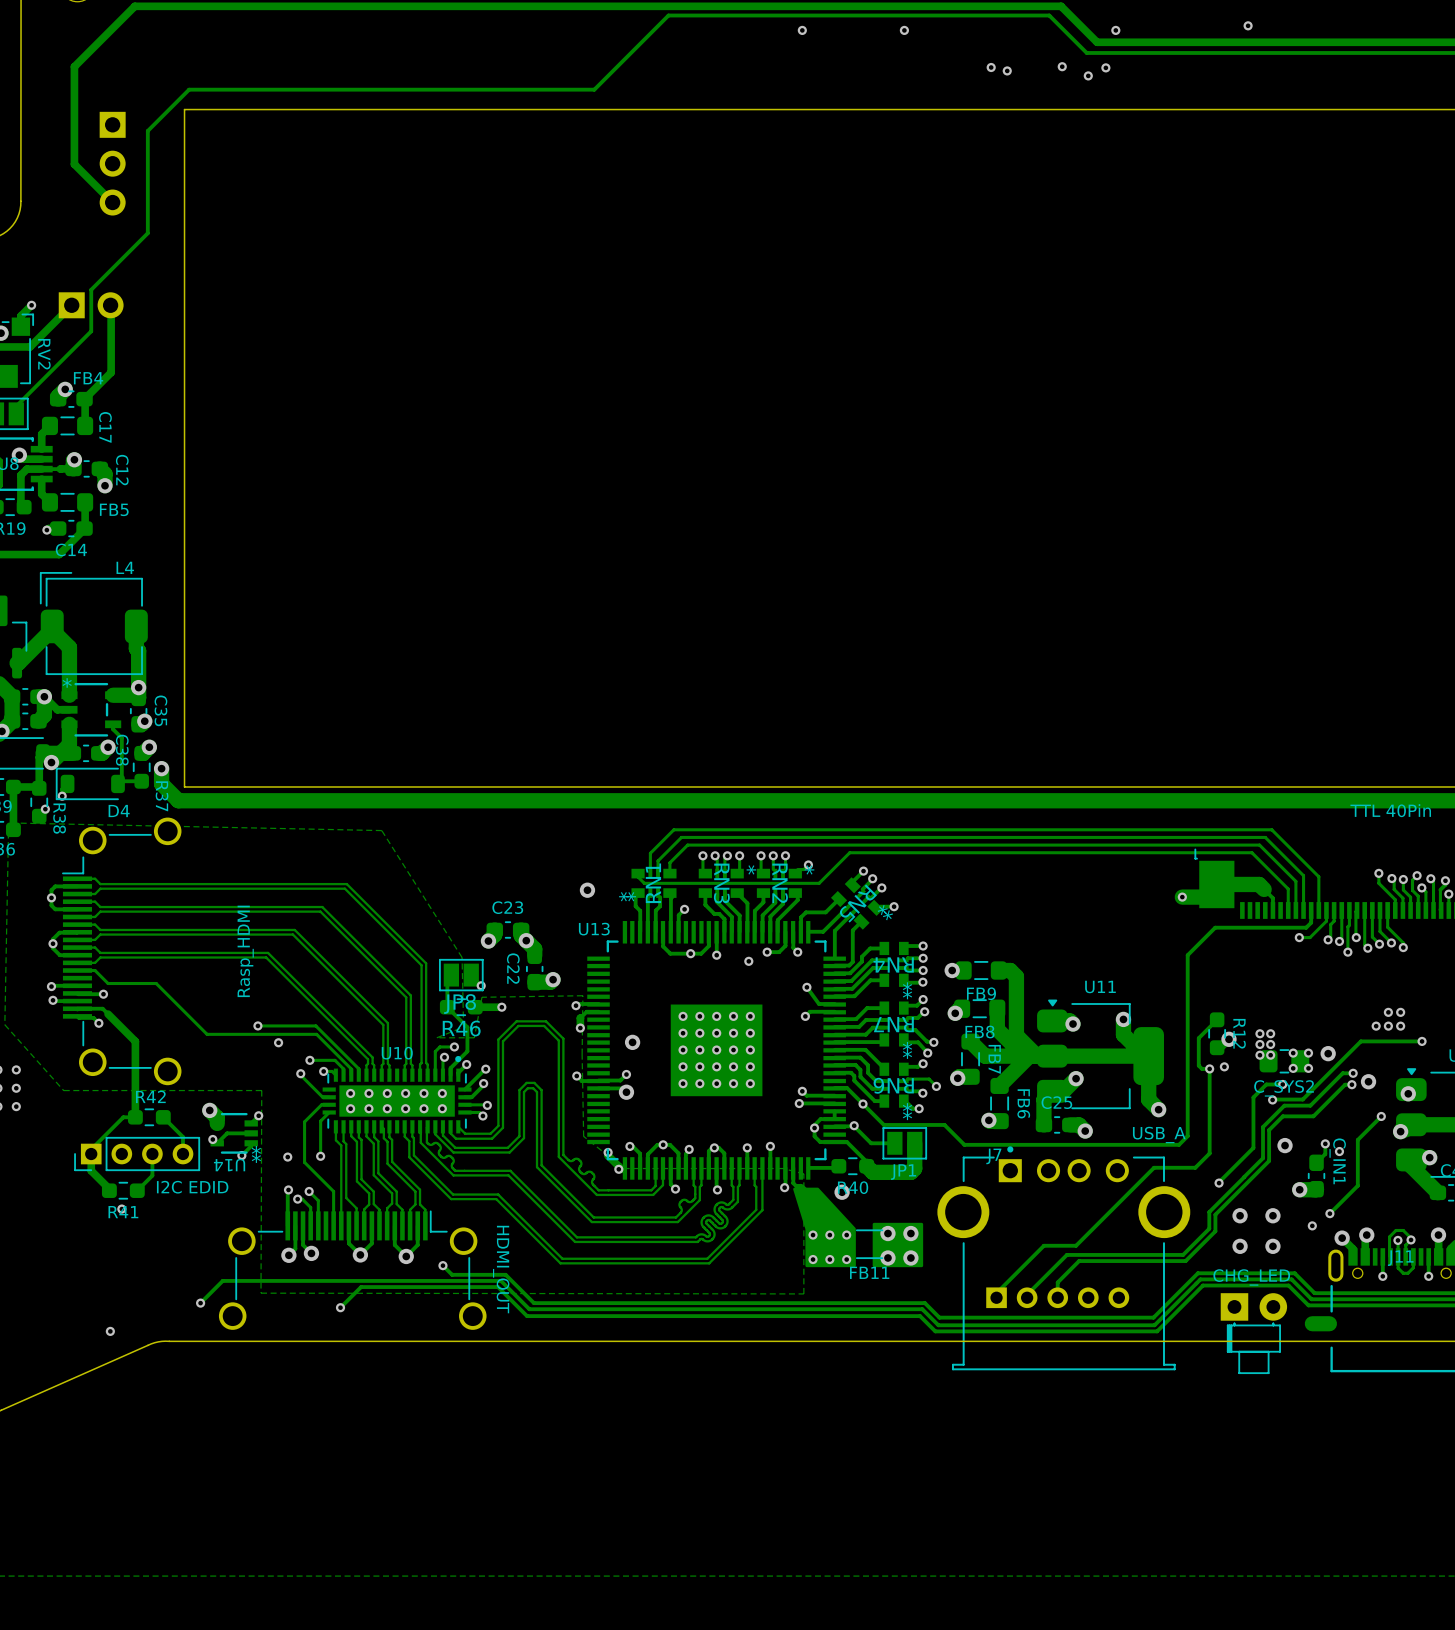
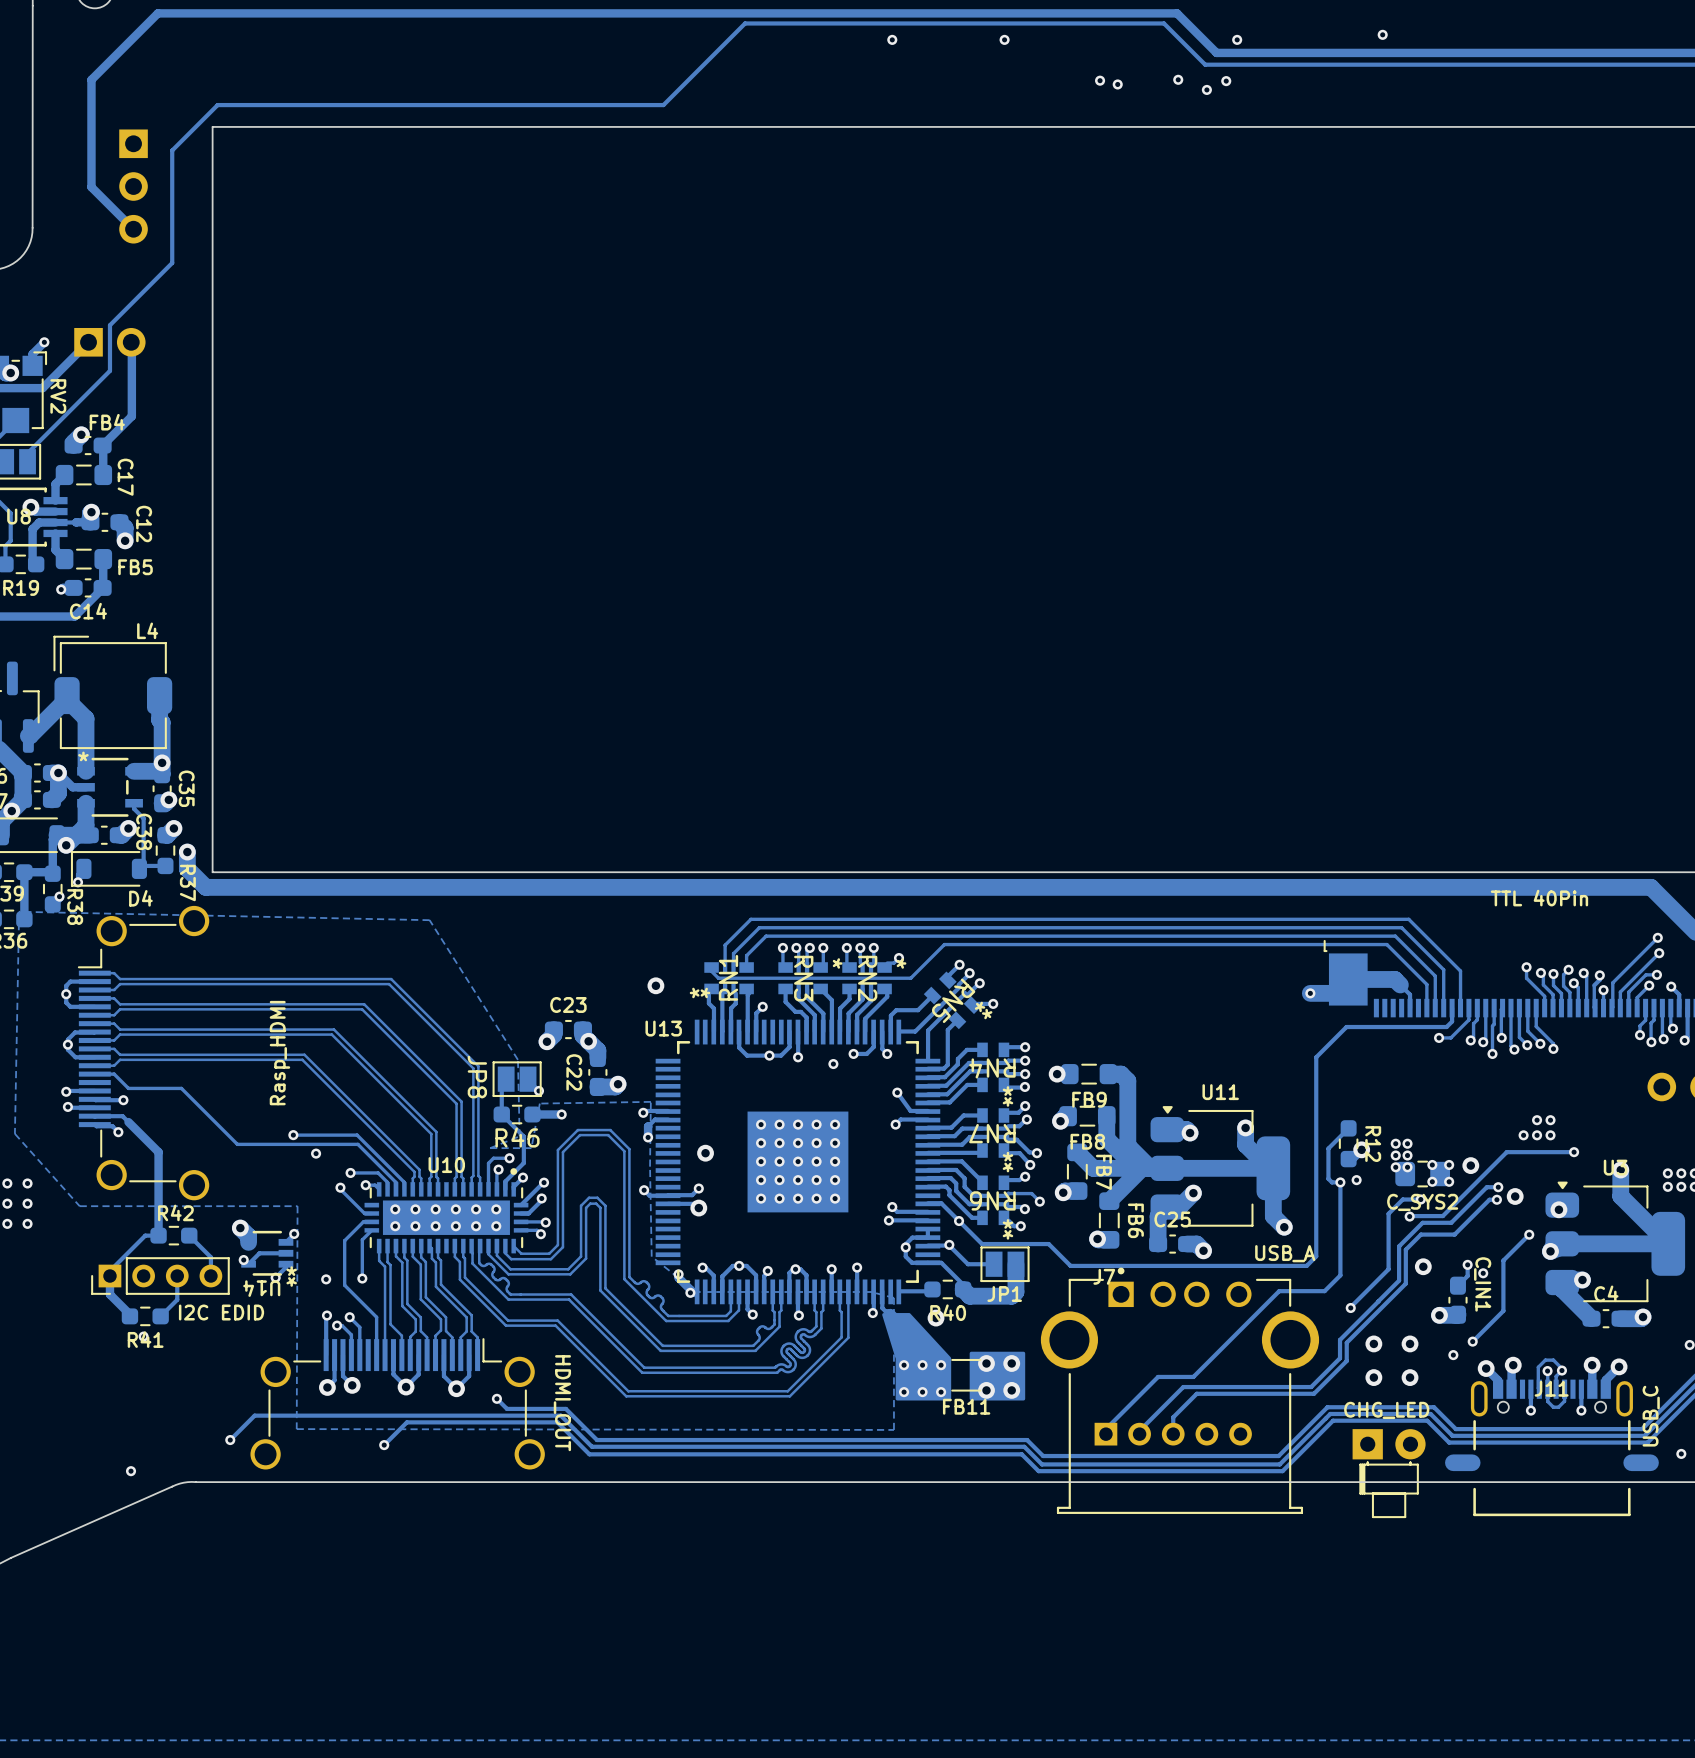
JP8 name rotation: 0° (460, 1004) -> 90° clockwise (477, 1077)

